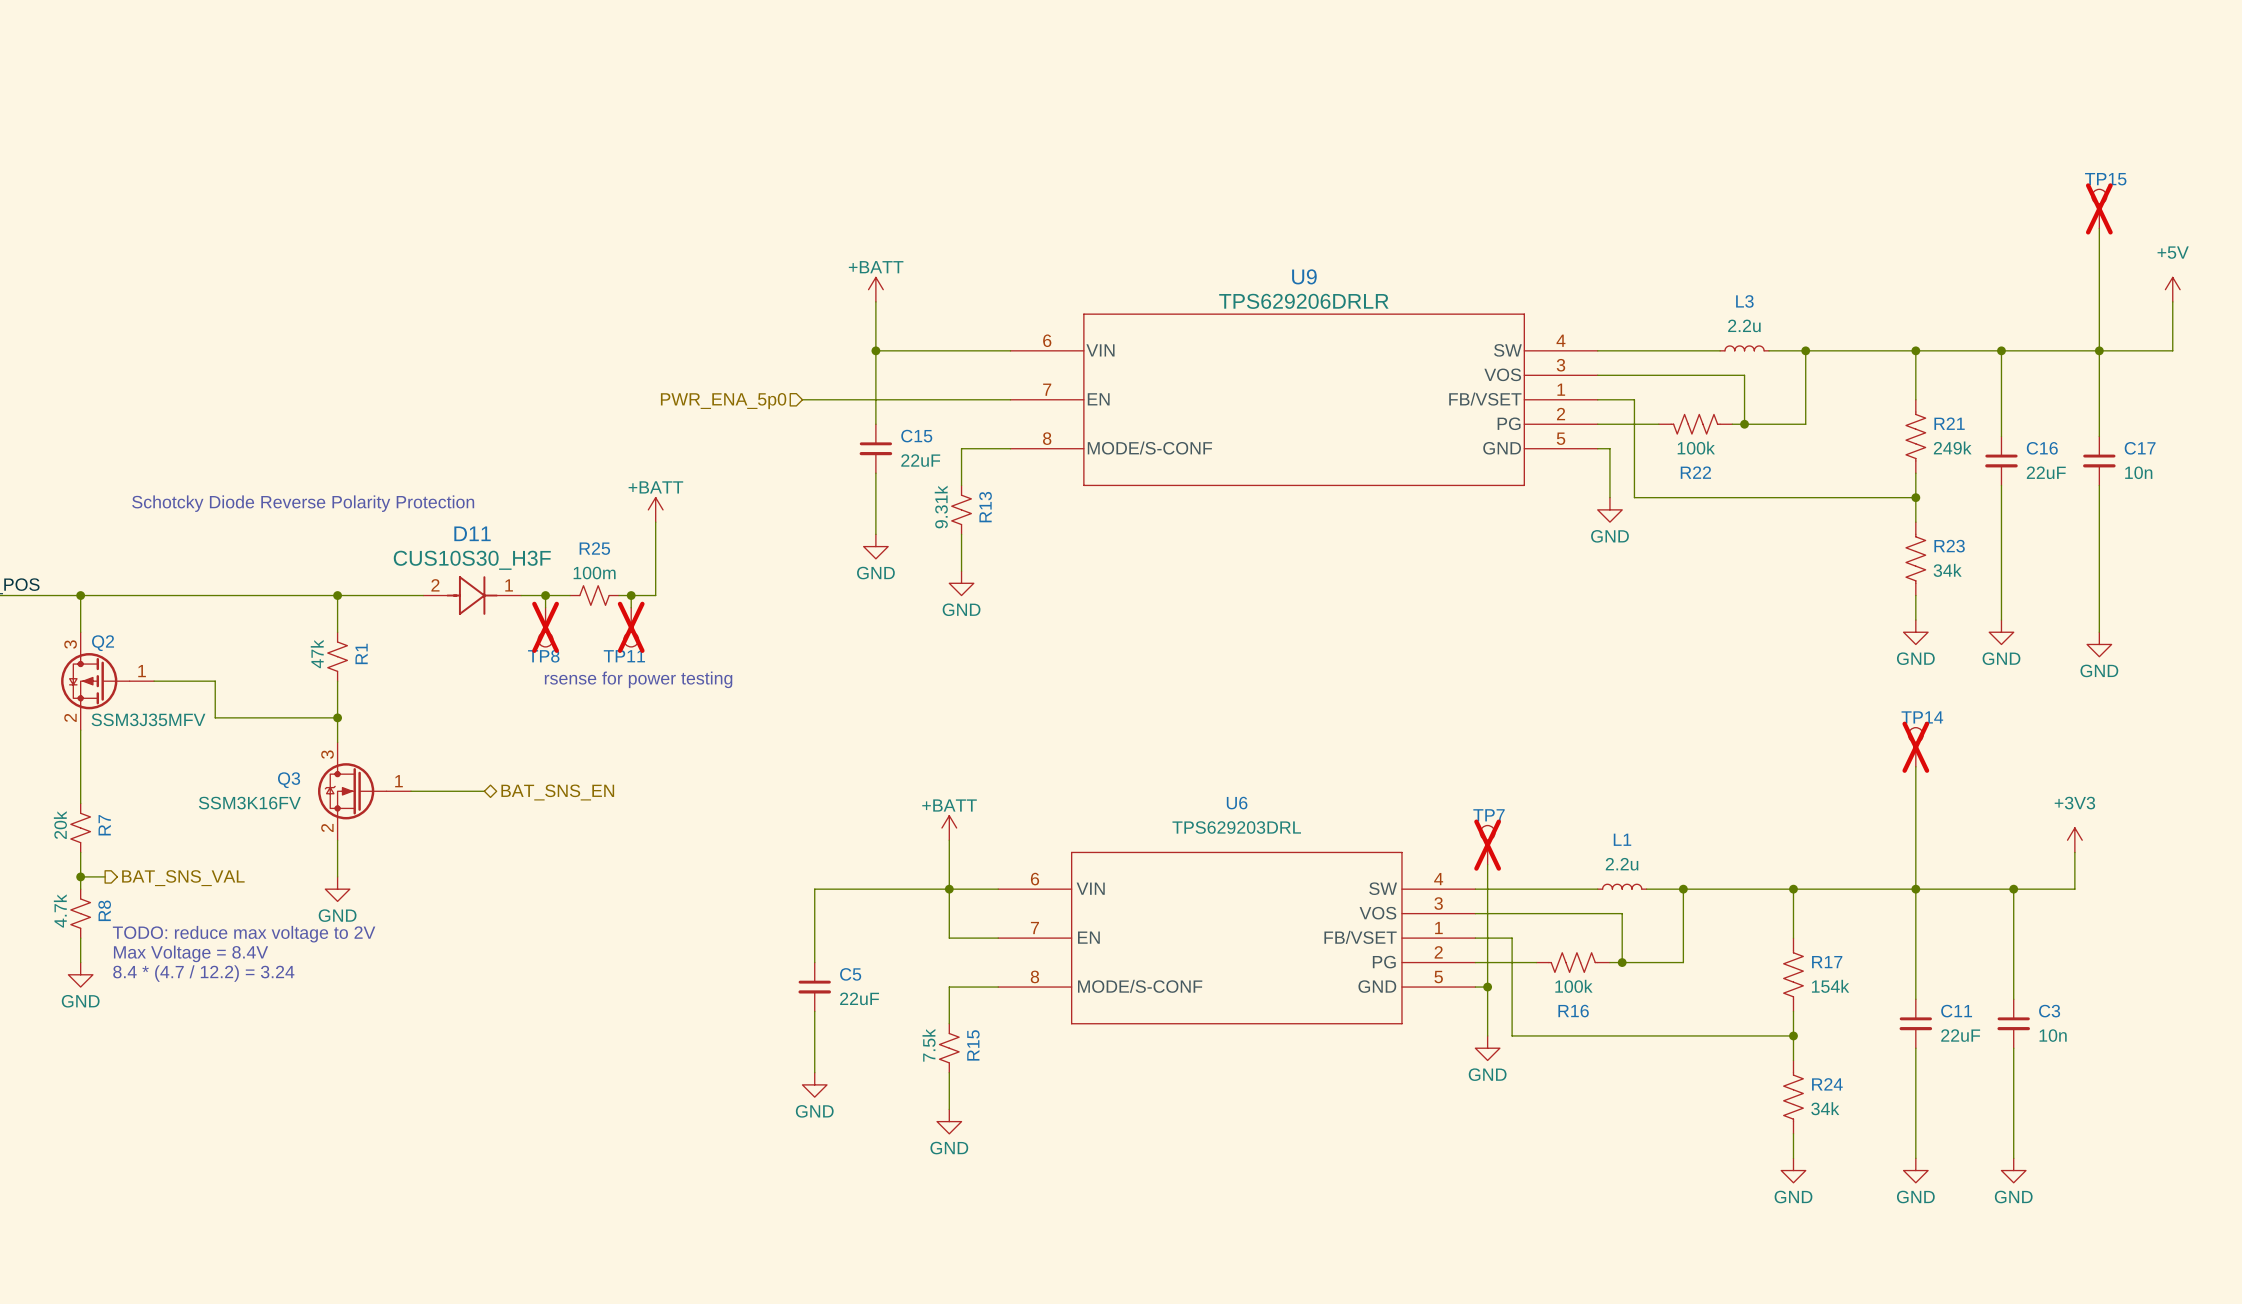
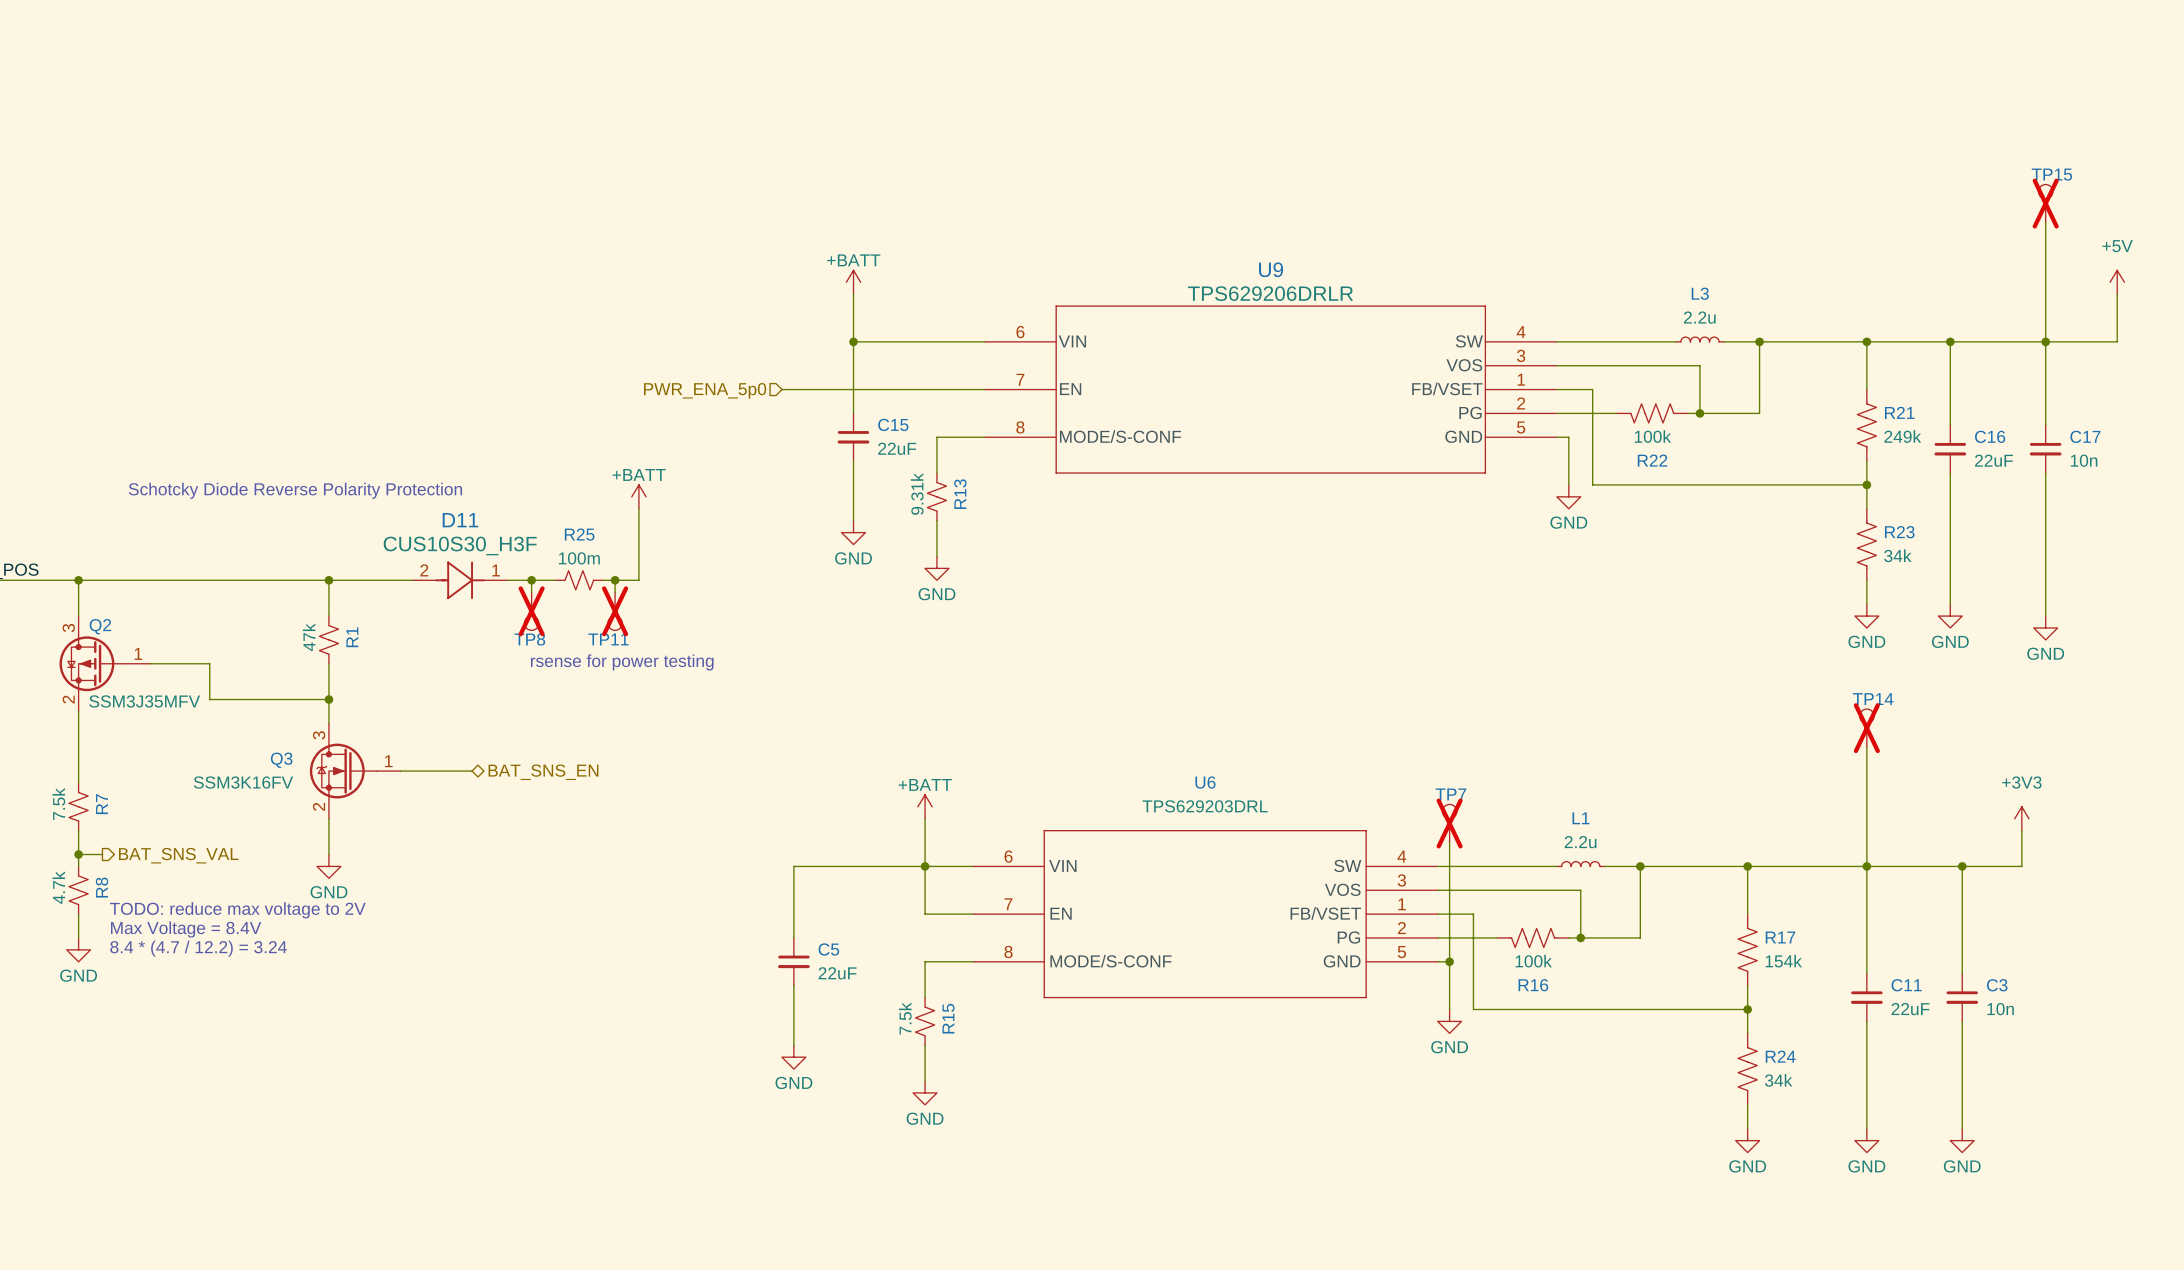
R7 value: 20k (60, 825) -> 7.5k (58, 803)

